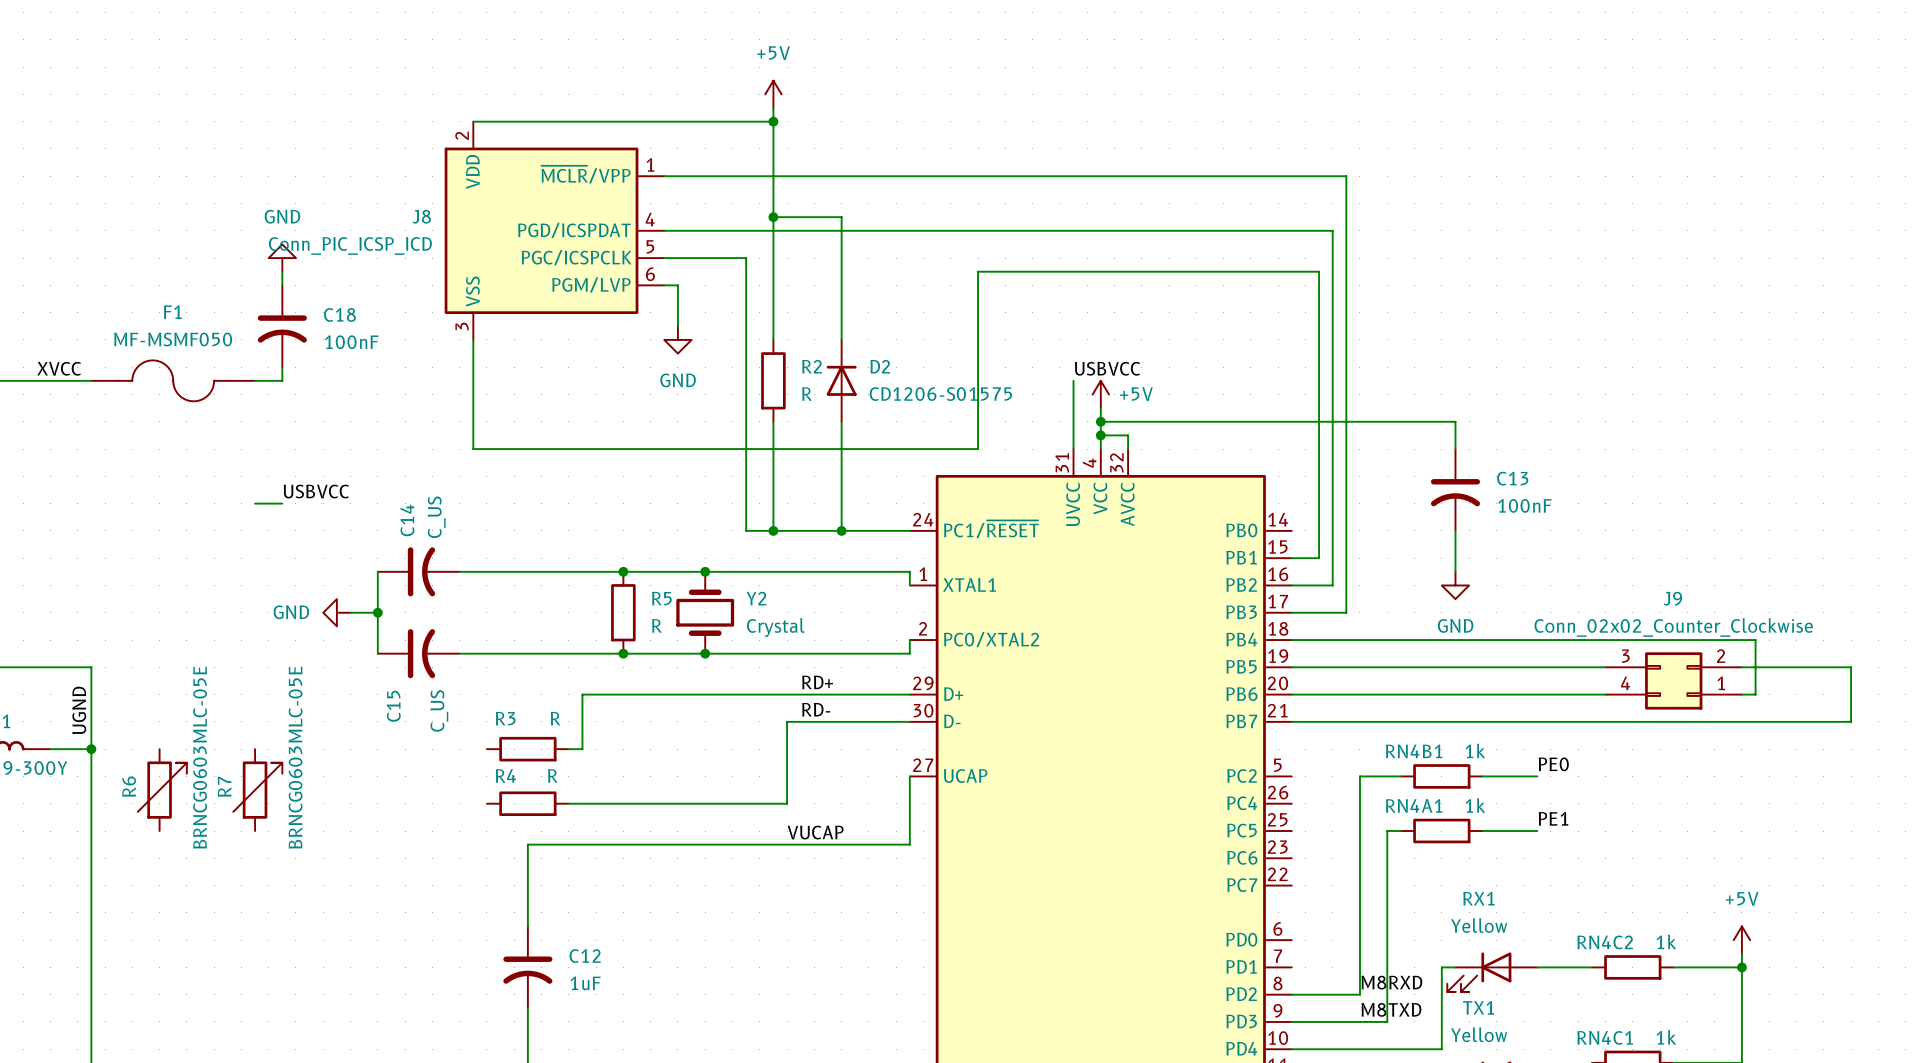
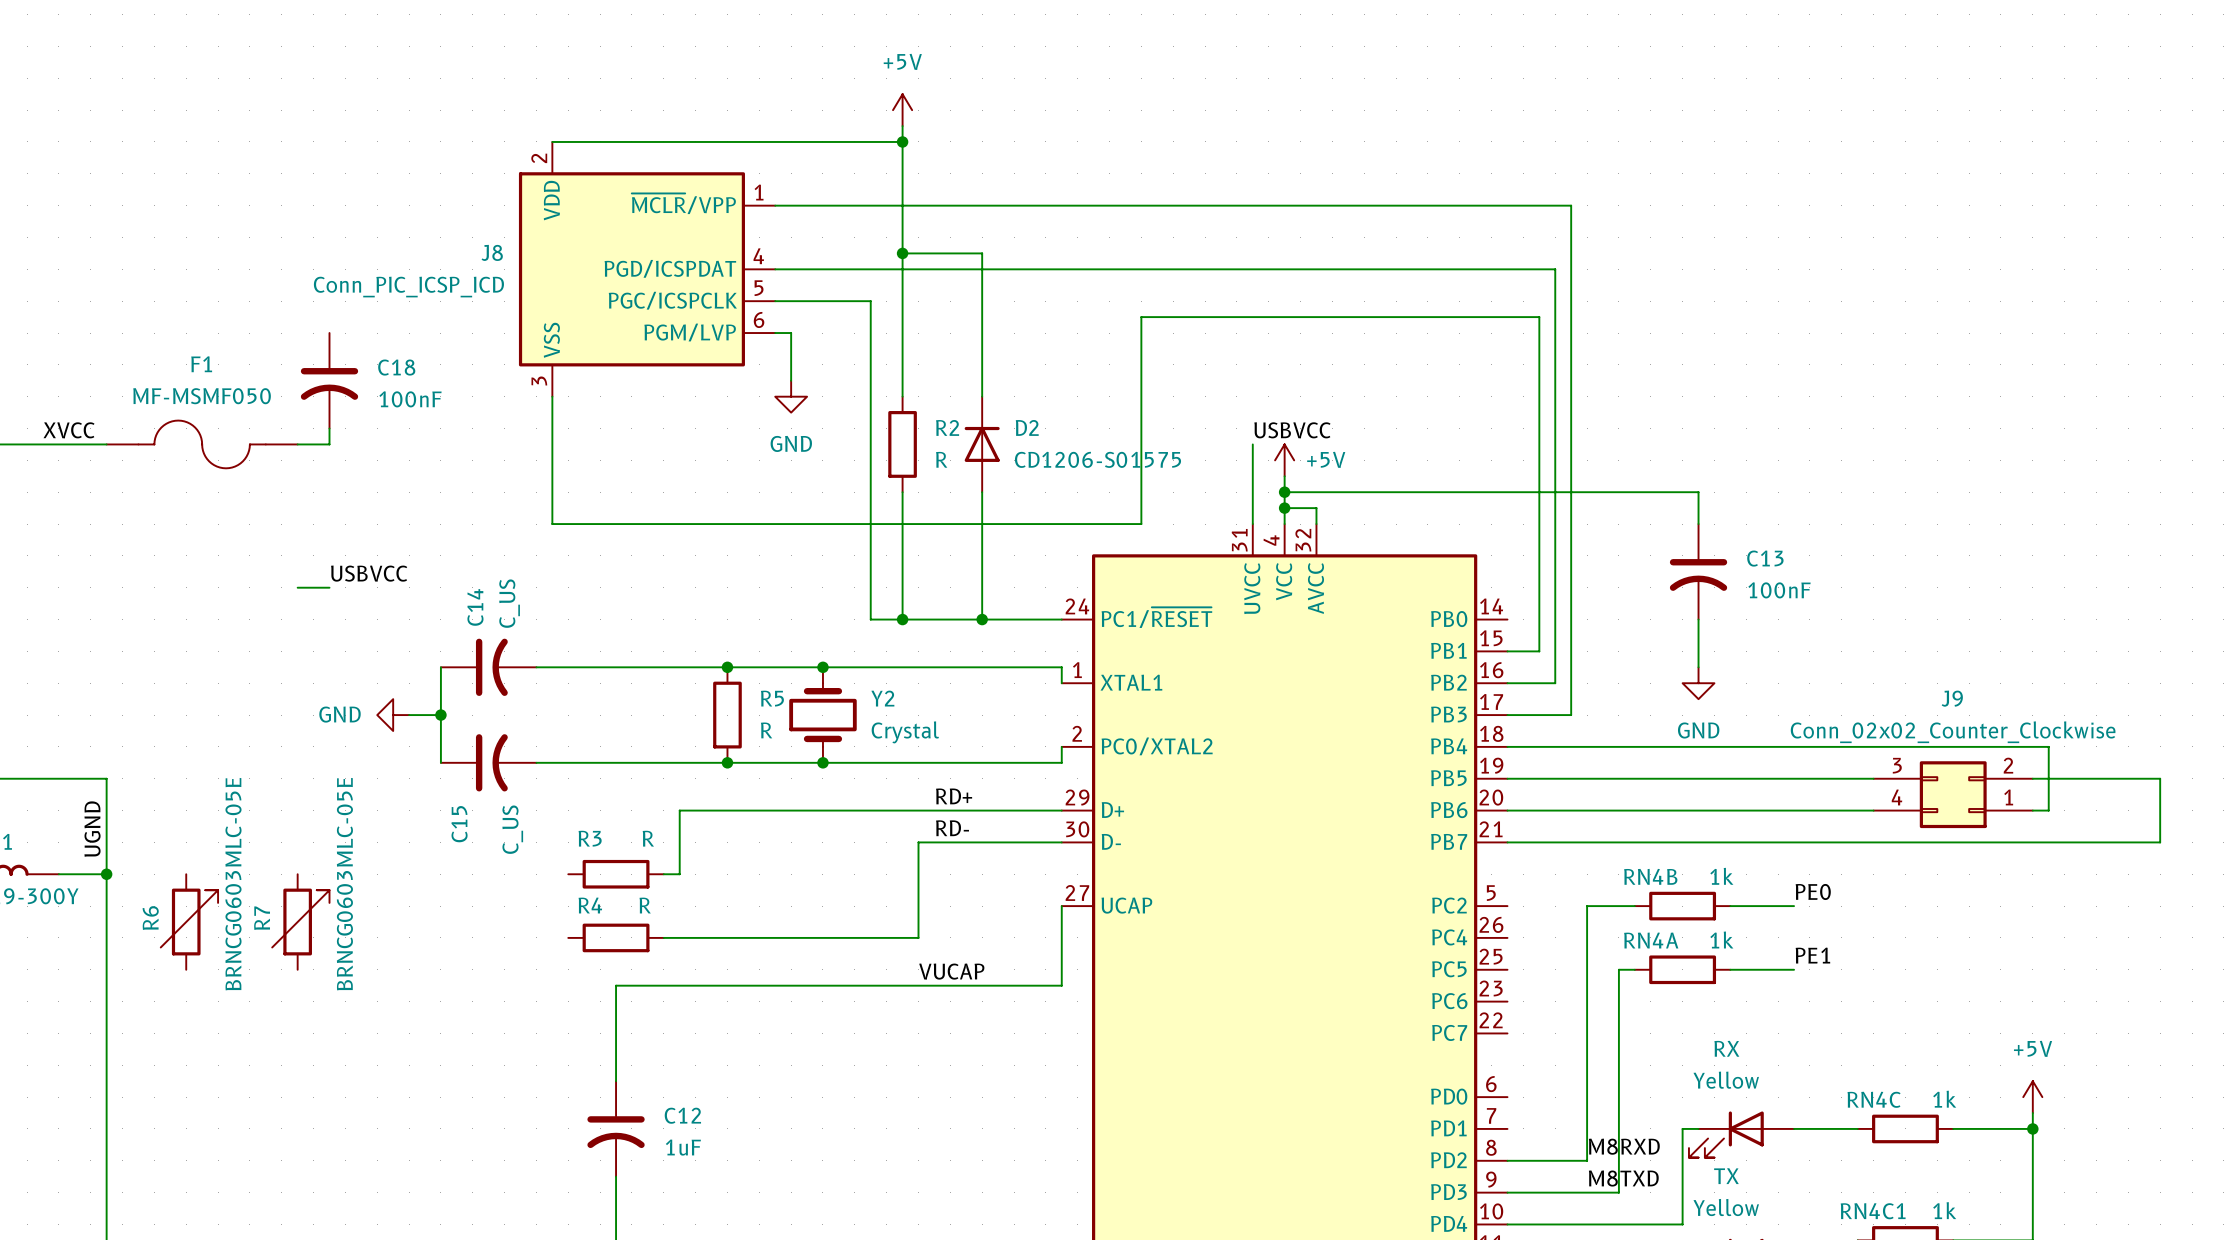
power symbol: GND (282, 258) -> none
wire: (282, 271) (282, 285) -> none
RN4B1 name: RN4B1 (1414, 751) -> RN4B (1650, 876)
RN4A1 name: RN4A1 (1414, 805) -> RN4A (1651, 940)
RX1 name: RX1 (1478, 898) -> RX (1726, 1048)
RN4C2 name: RN4C2 (1605, 942) -> RN4C (1874, 1099)
TX1 name: TX1 (1478, 1007) -> TX (1726, 1176)

